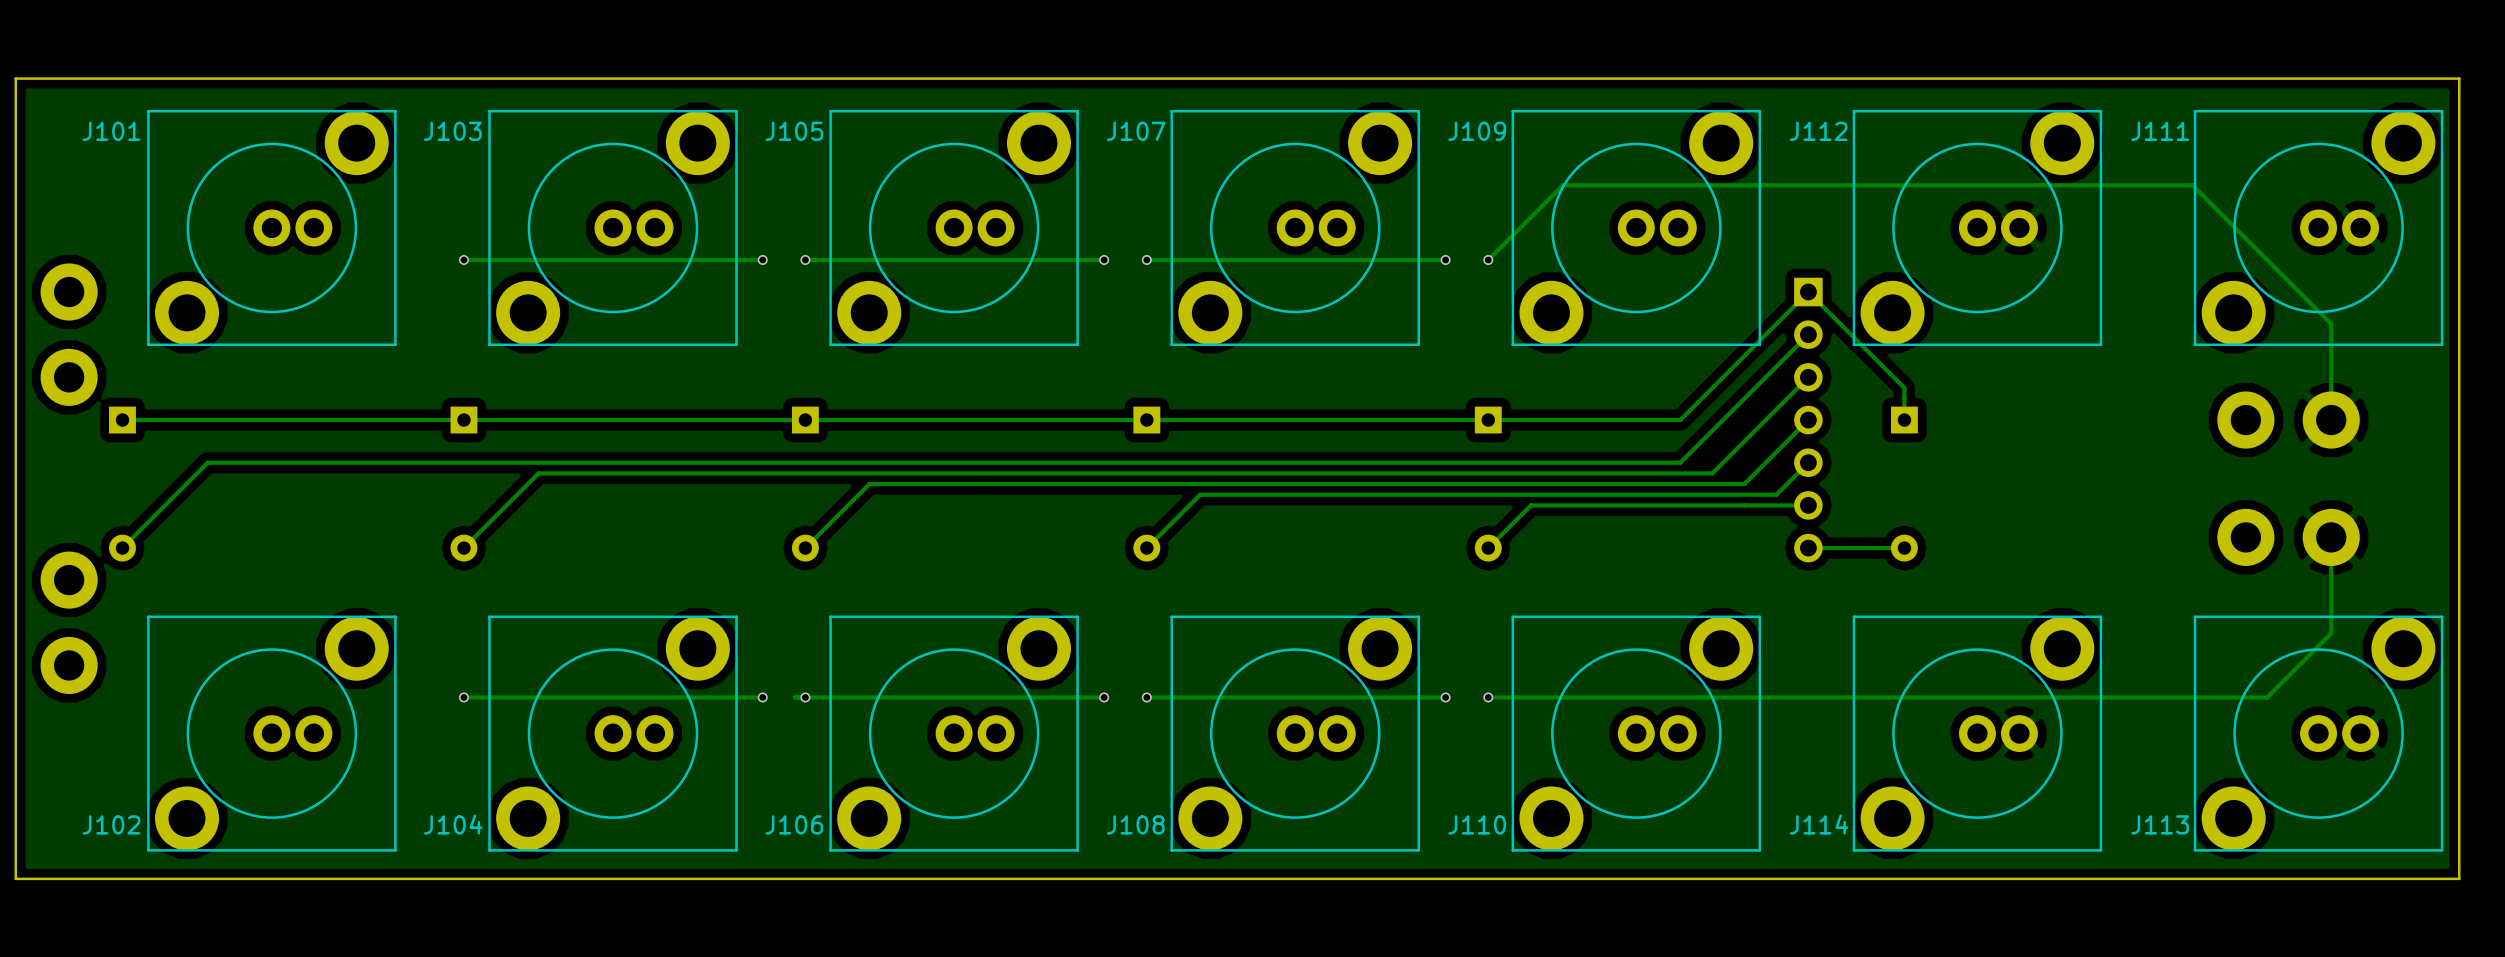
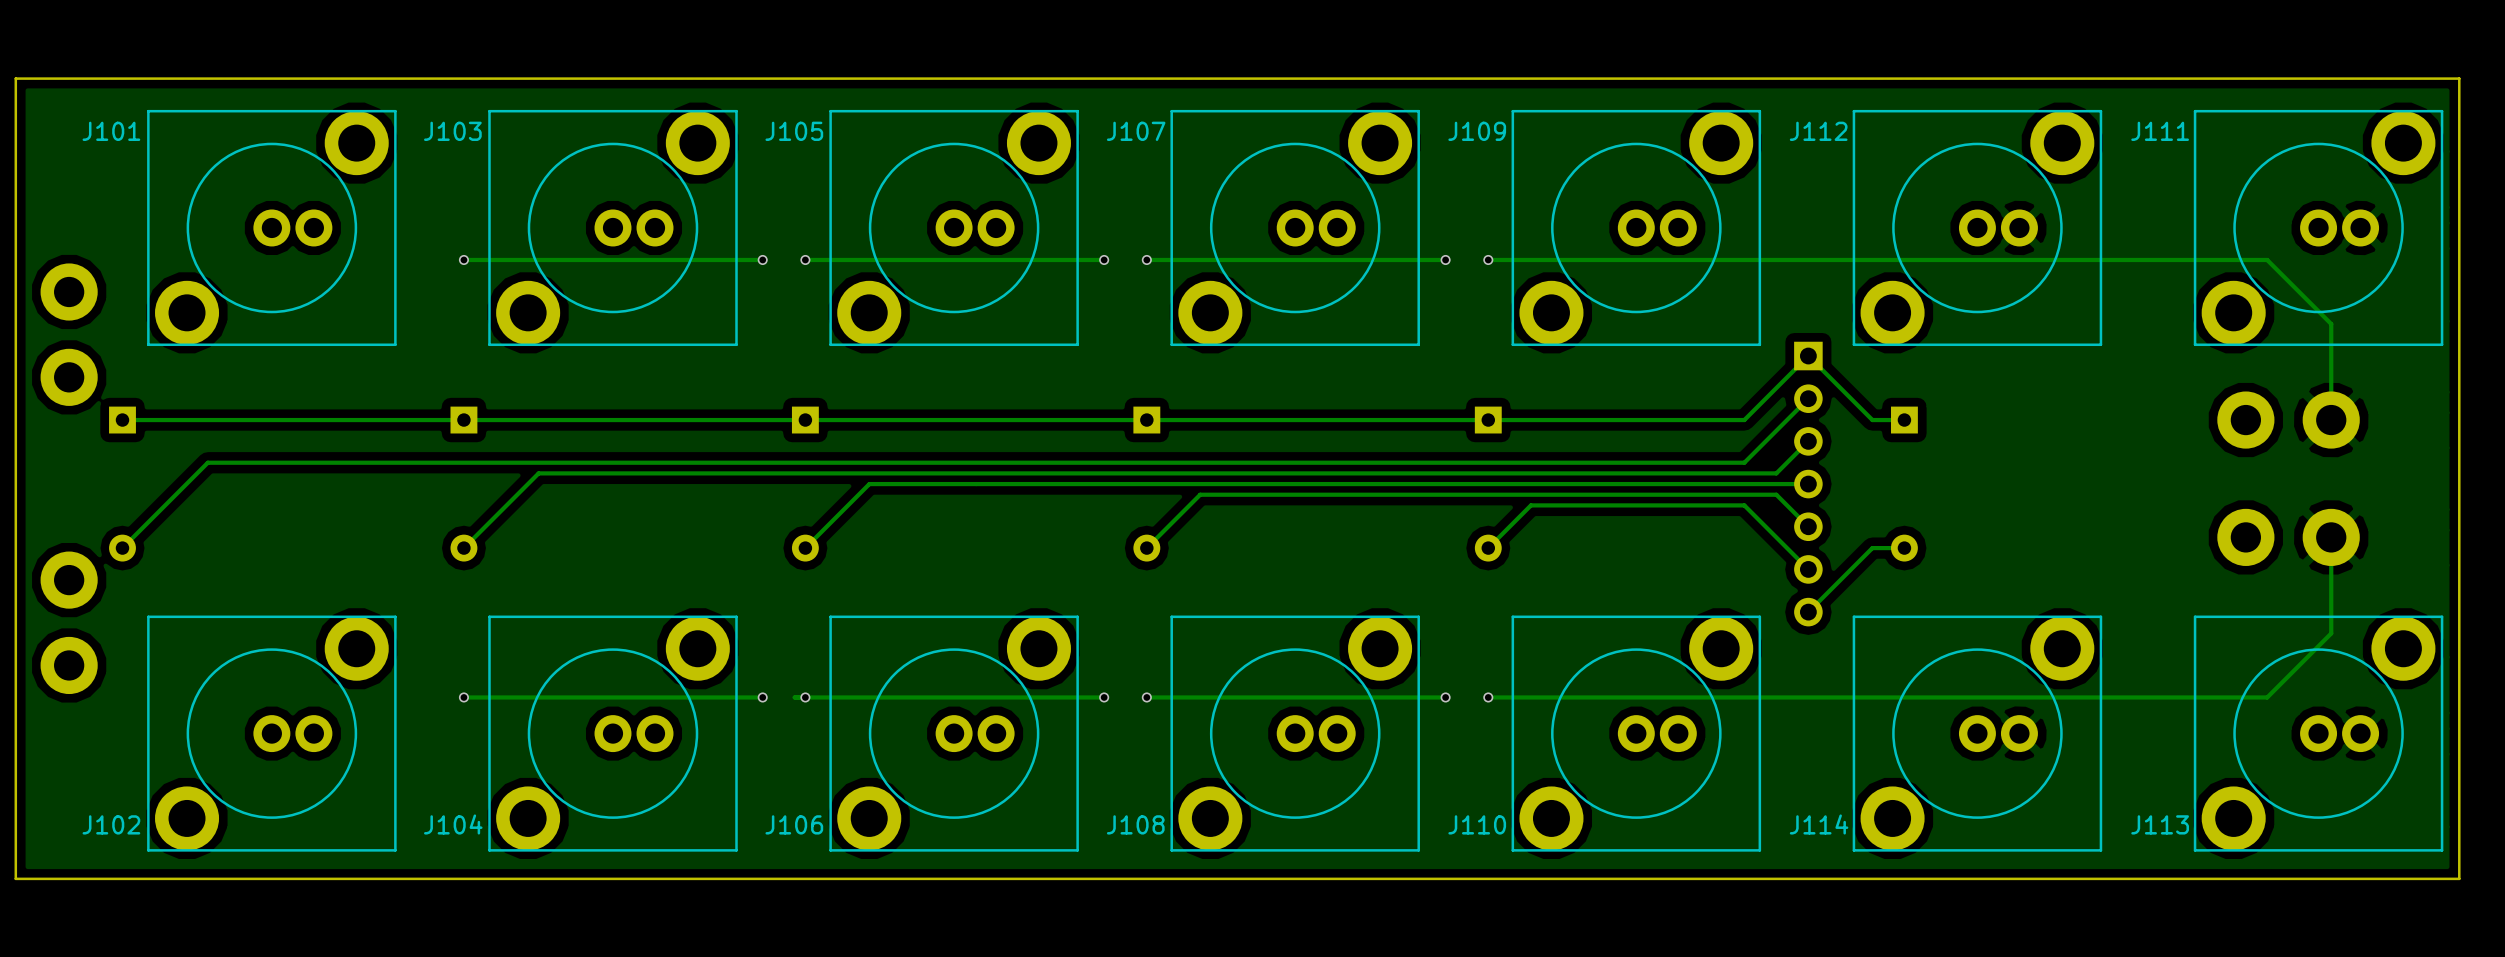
track: (2267, 259) (2192, 185) (1562, 185) (1488, 259) -> (2267, 259) (1488, 259)
track: (1808, 334) (1680, 462) -> (1808, 398) (1744, 462) (1680, 462)
track: (1808, 377) (1712, 473) -> (1808, 441) (1776, 473) (1712, 473)
track: (1808, 420) (1744, 484) -> (1808, 484) (1744, 484)
part position: (1808, 420) -> (1808, 484)
track: (1904, 420) (1904, 388) (1808, 292) (1680, 420) -> (1904, 420) (1872, 420) (1808, 356) (1744, 420) (1680, 420)
track: (1808, 462) (1776, 494) -> (1808, 526) (1776, 494)
track: (1808, 505) (1744, 505) -> (1808, 569) (1744, 505)
track: (1872, 548) (1808, 548) -> (1872, 548) (1808, 612)

